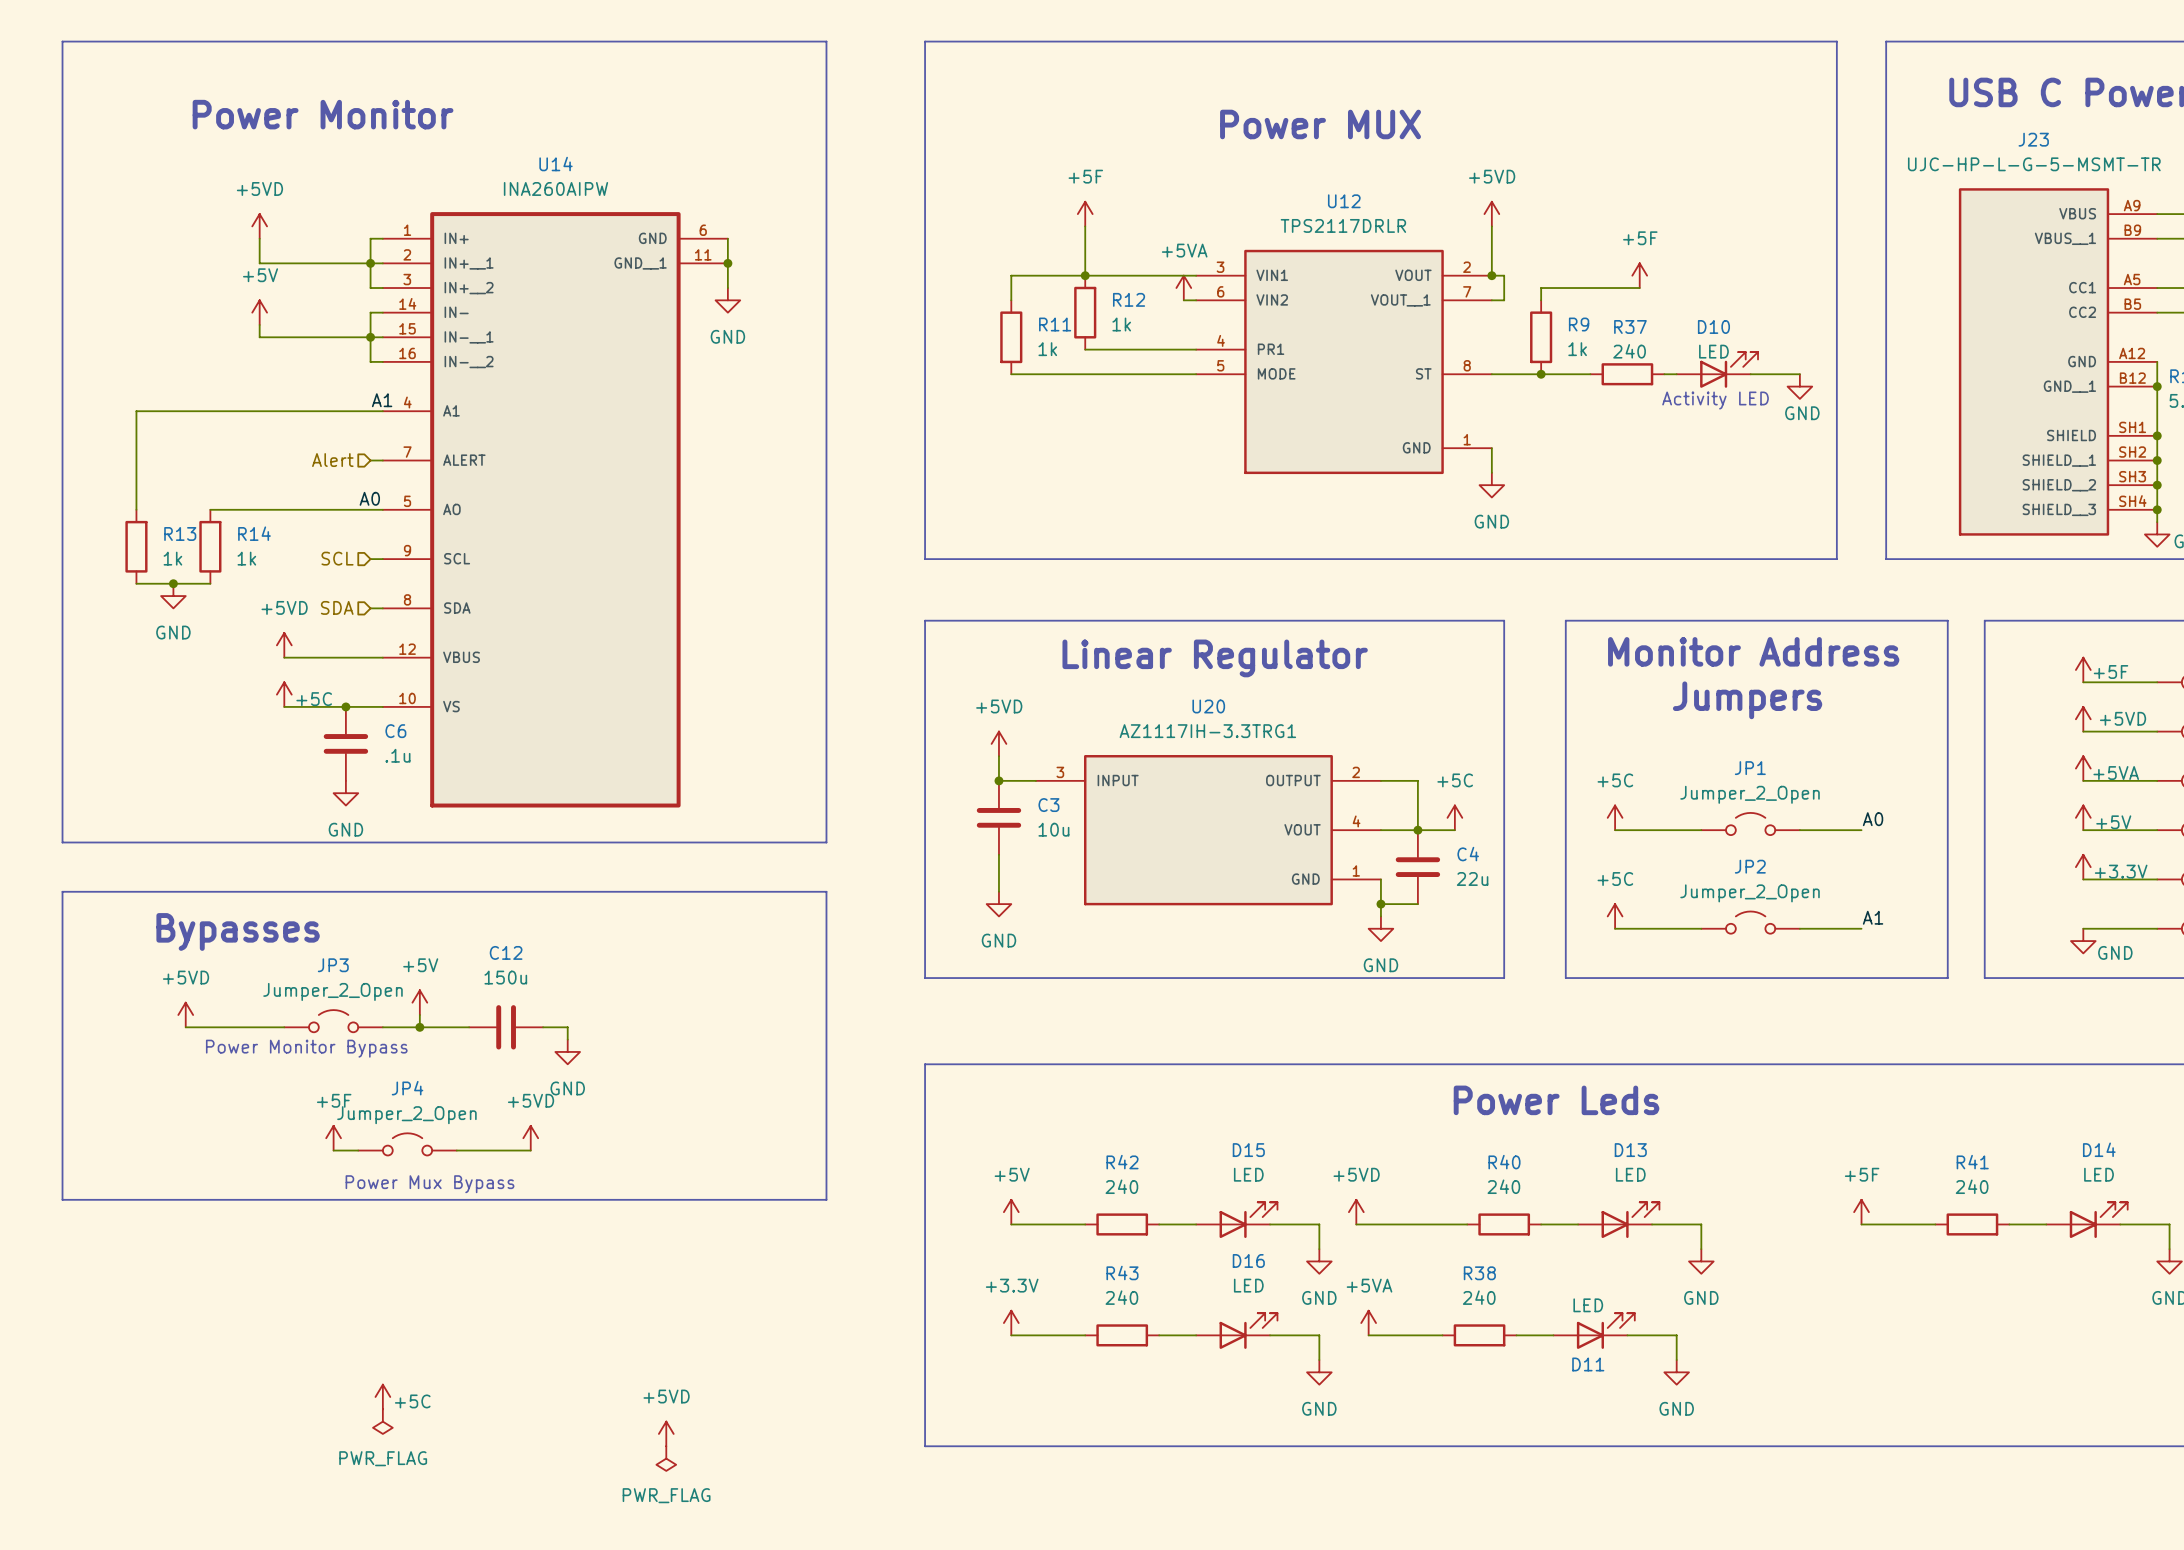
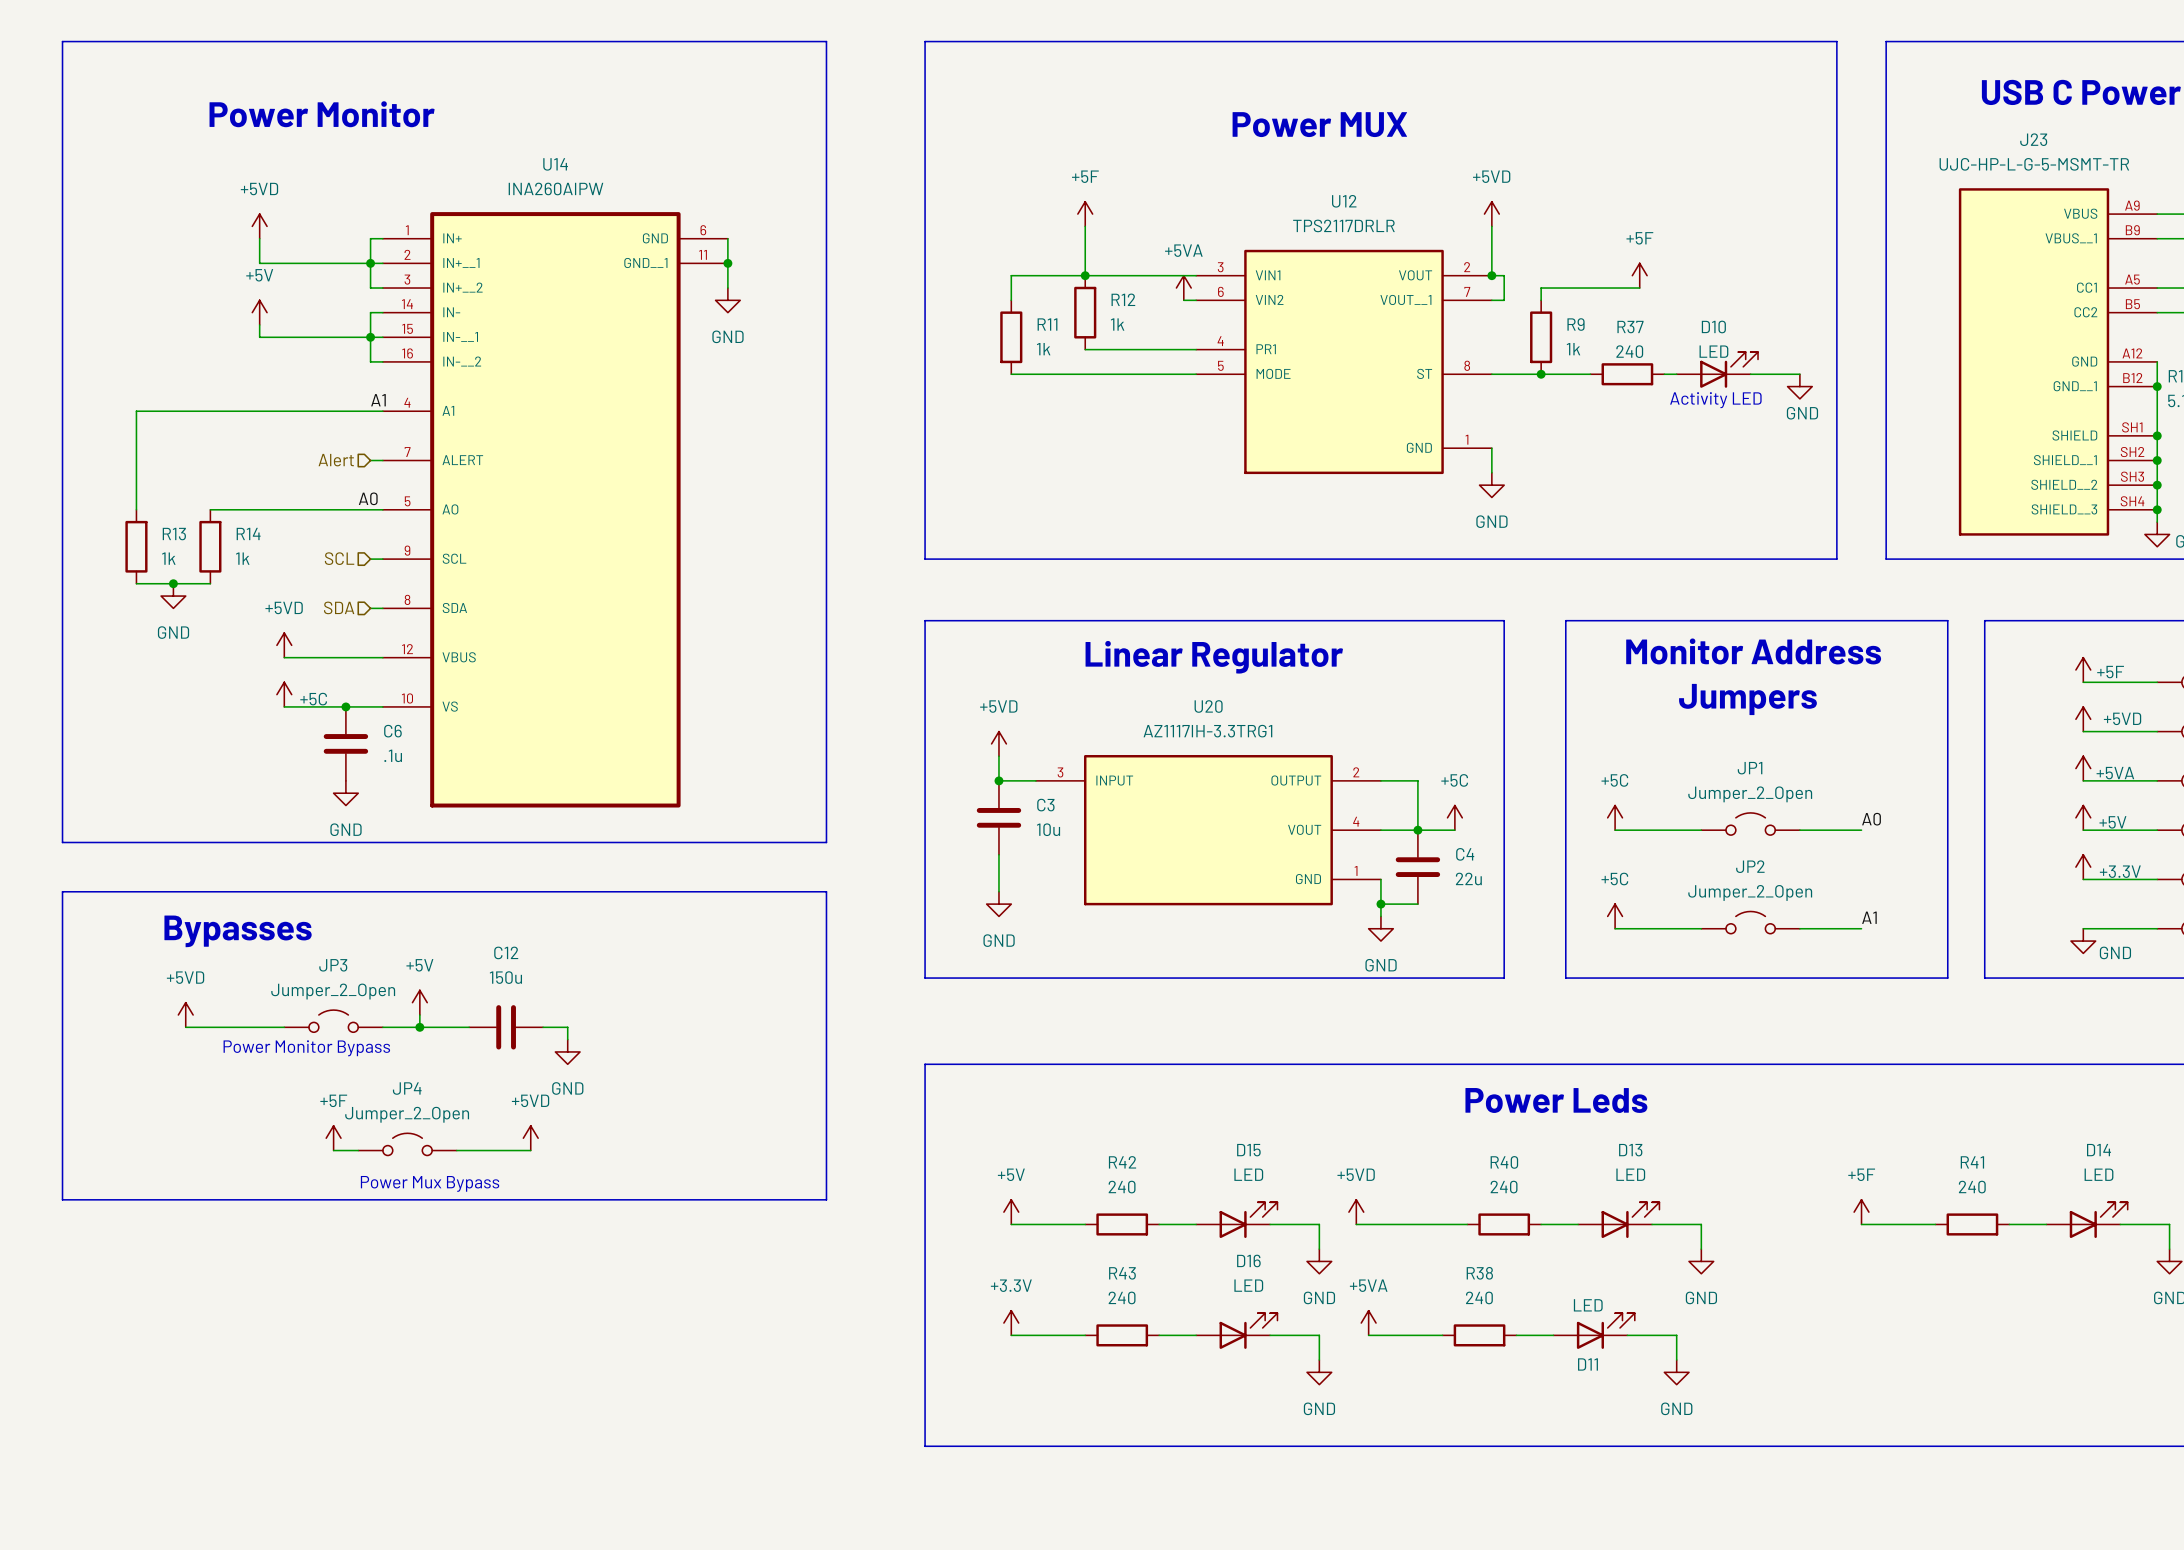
power symbol: +5C (382, 1396) -> none
power symbol: PWR_FLAG (382, 1421) -> none
power symbol: +5VD (666, 1433) -> none
power symbol: PWR_FLAG (666, 1458) -> none

